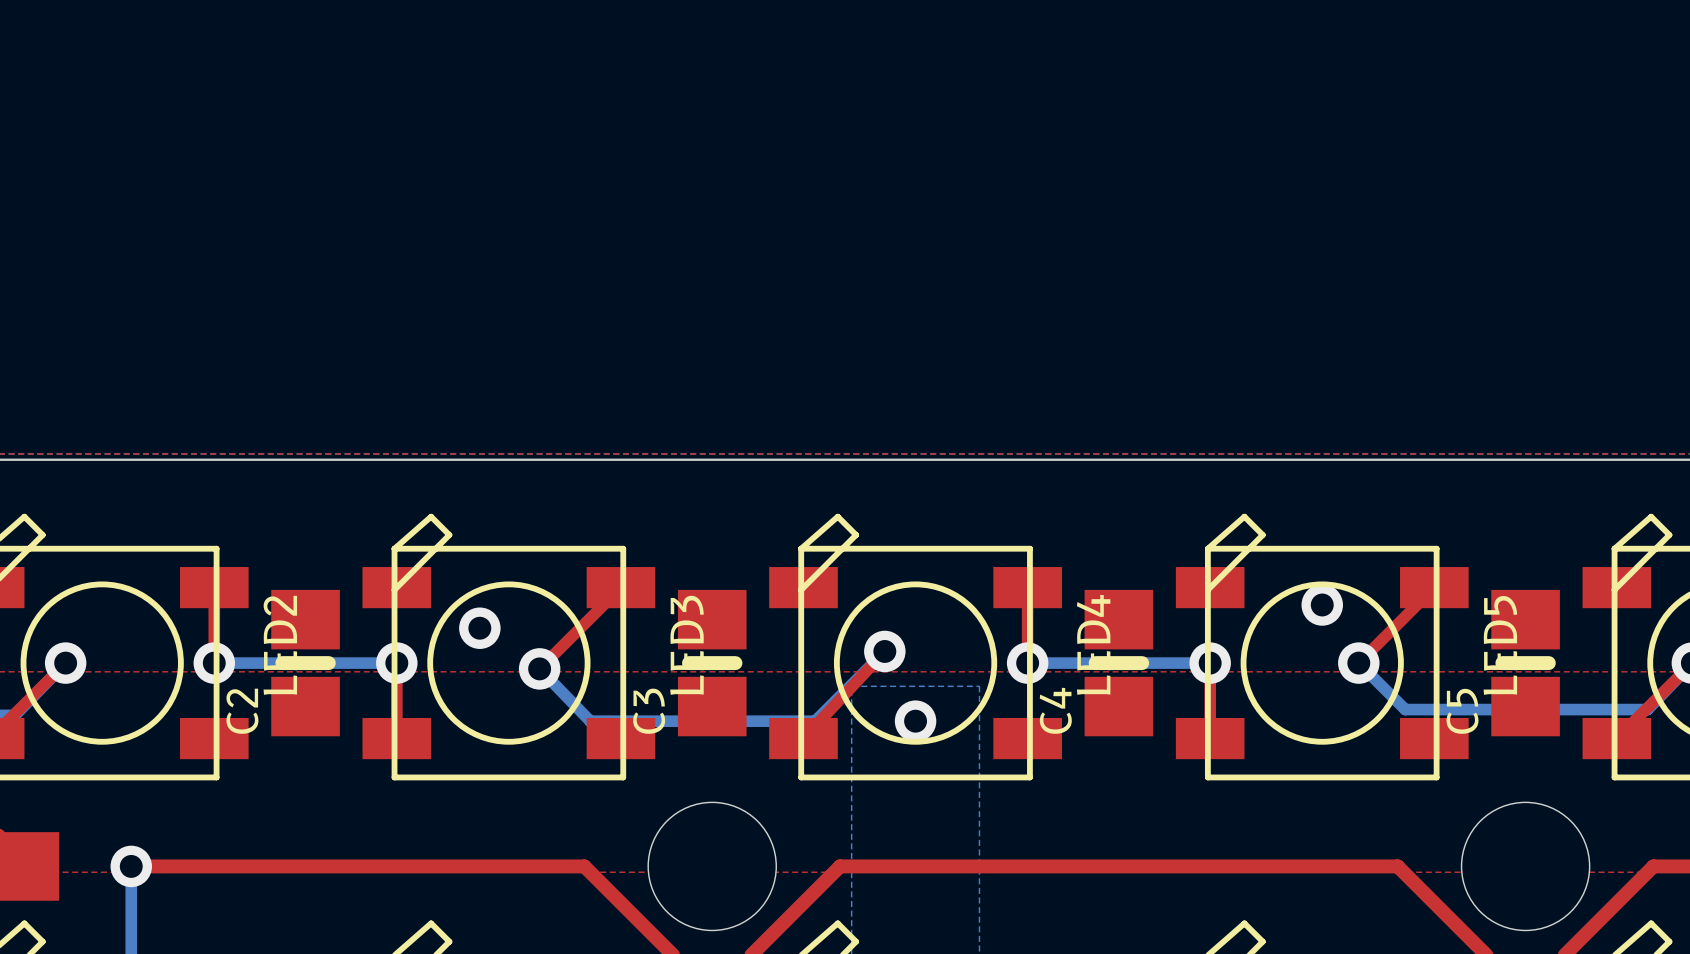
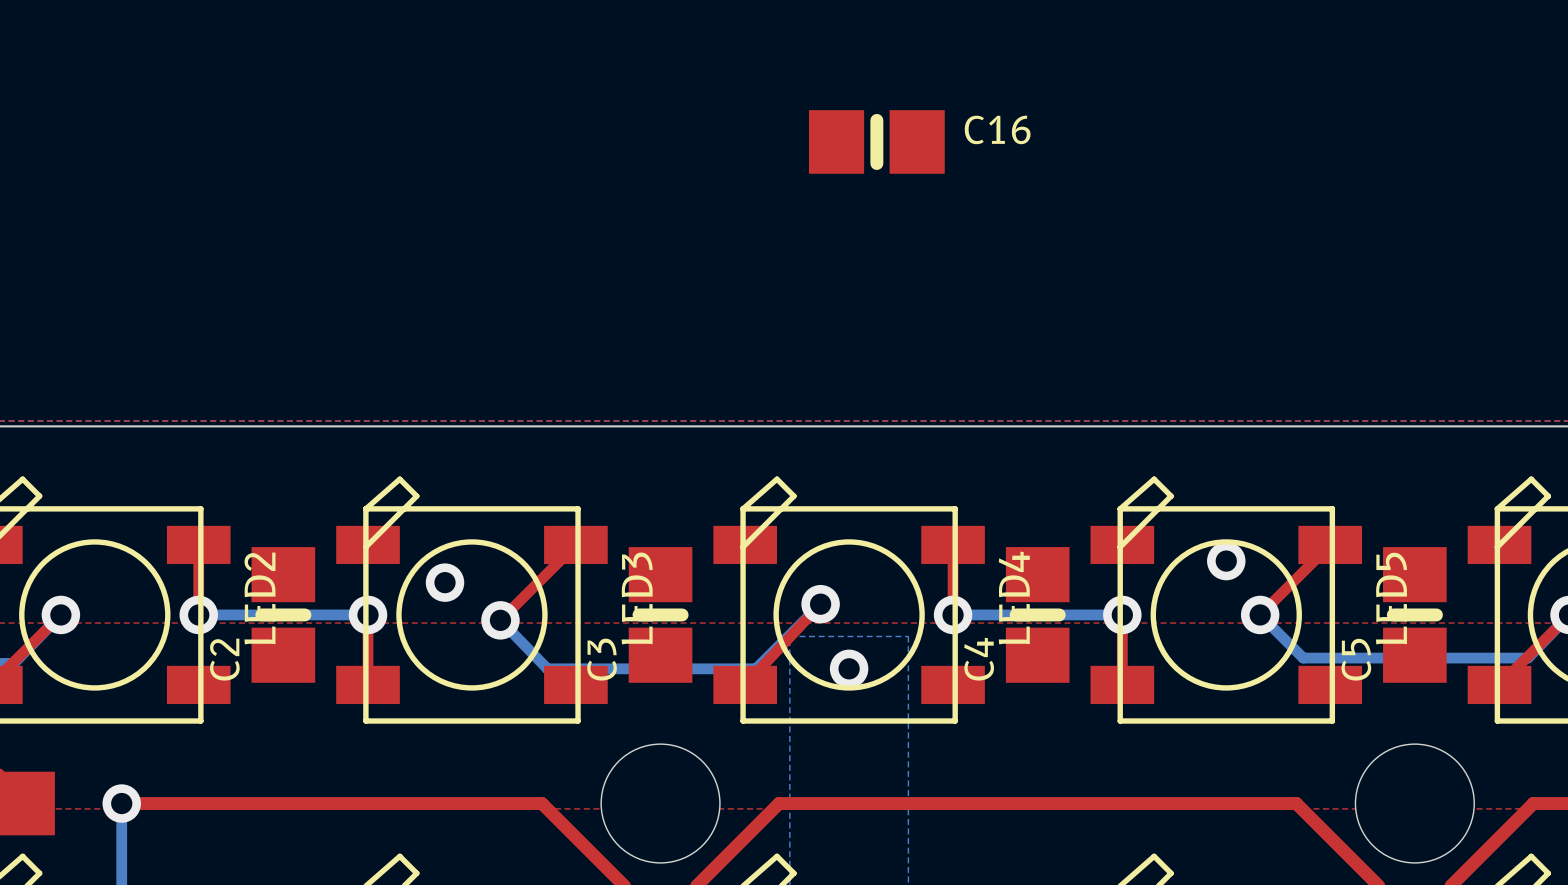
C16: none -> (876, 141)

